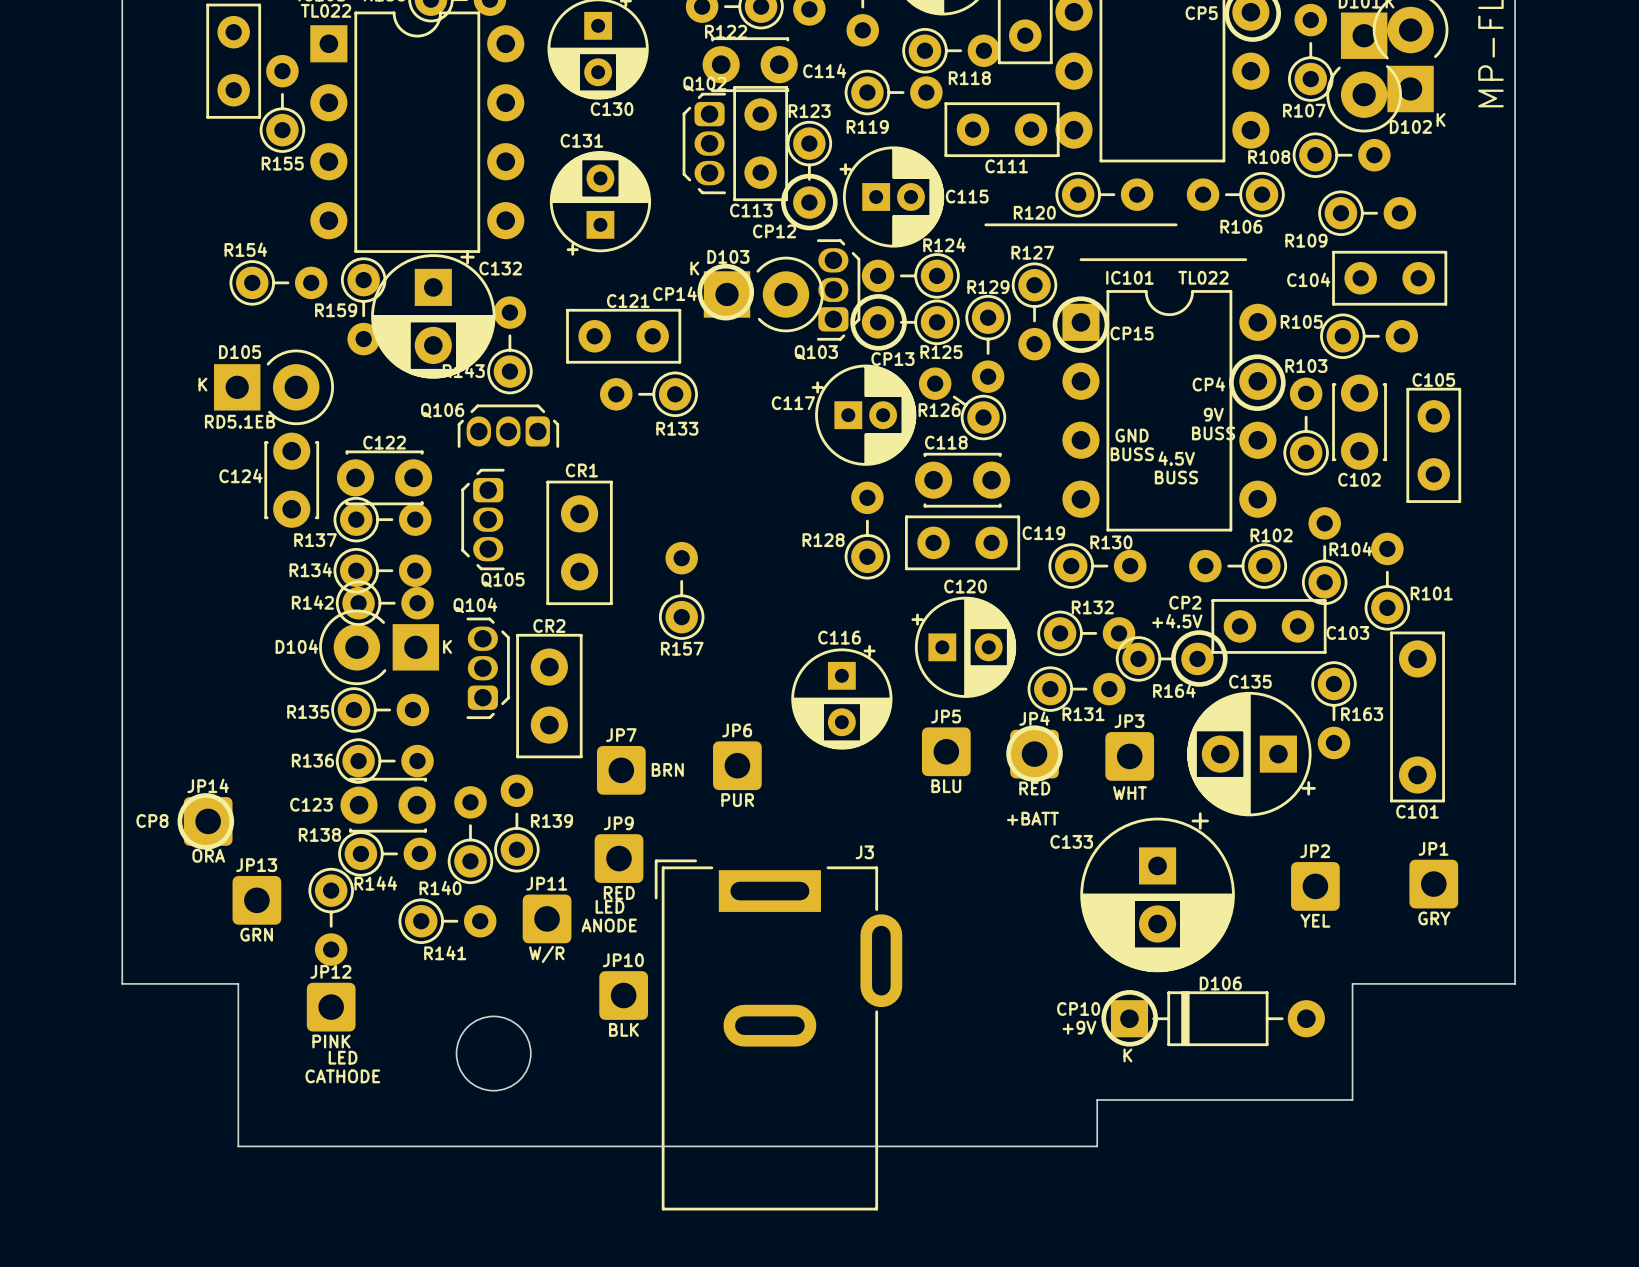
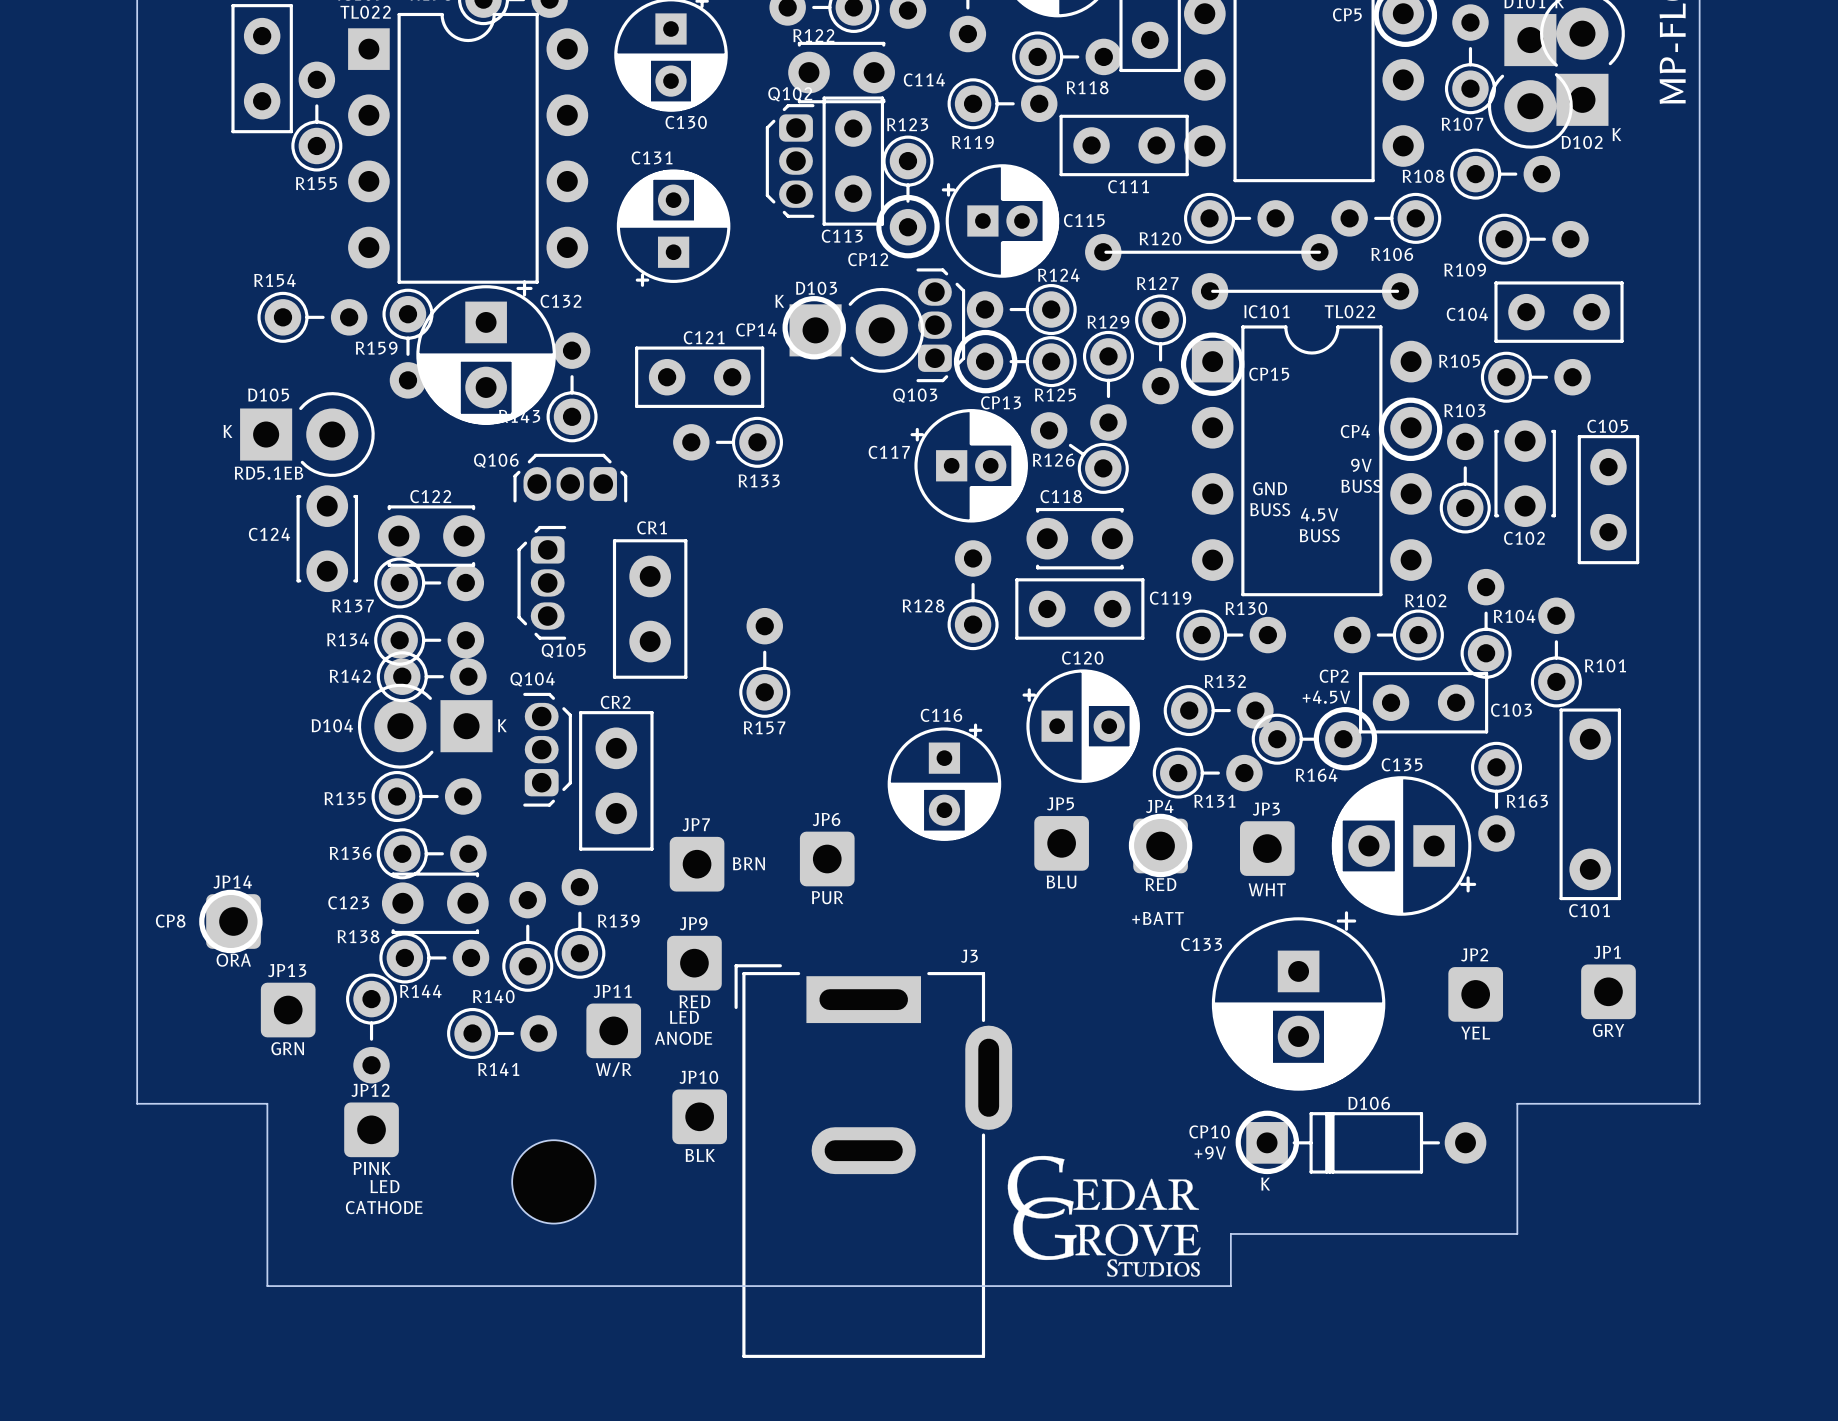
part: none -> (1103, 252)
part: none -> (1319, 252)
part: none -> (1210, 291)
part: none -> (1400, 291)
drawing: none -> [1007, 1155, 1201, 1277]

